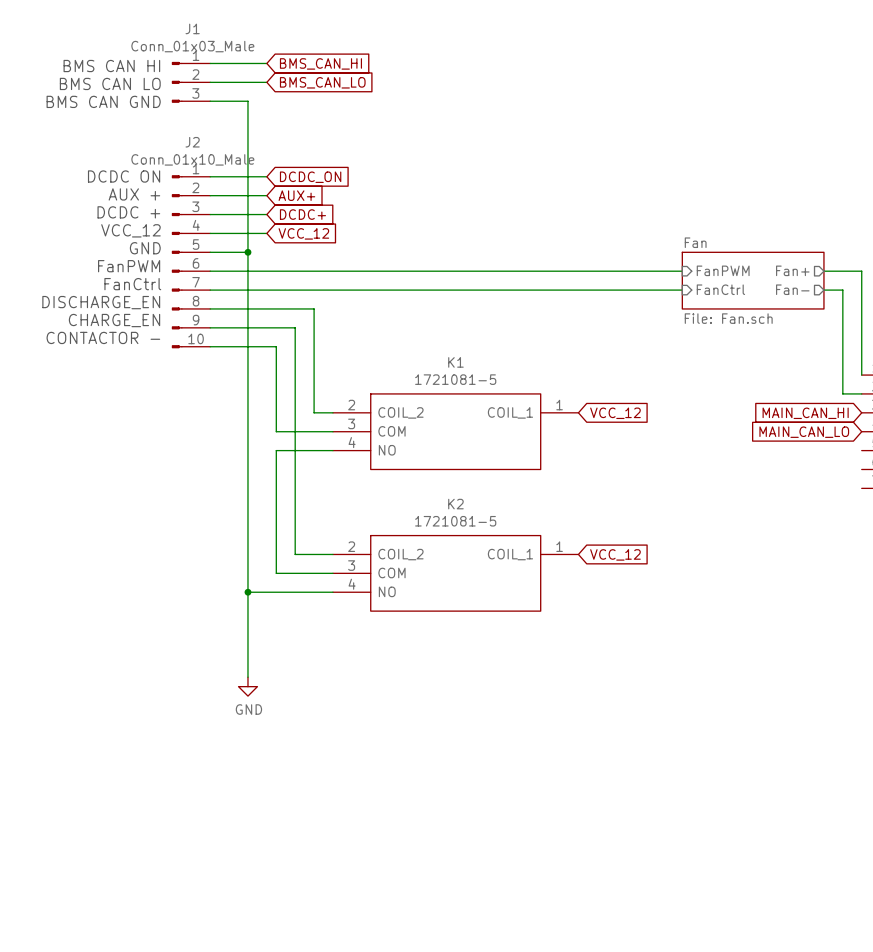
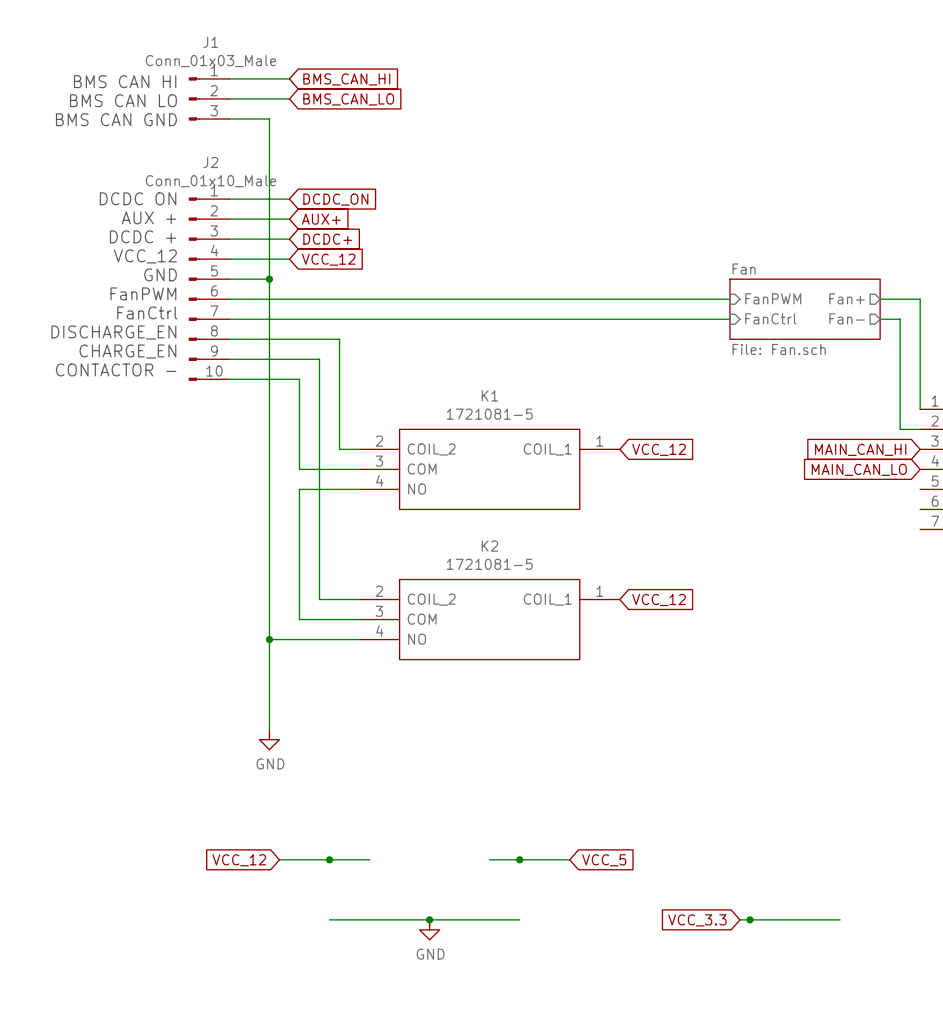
wire: none -> (279, 859) (369, 859)
junction: none -> (329, 859)
wire: none -> (489, 859) (569, 859)
junction: none -> (519, 859)
global label: none -> VCC_12 (239, 860)
global label: none -> VCC_5 (604, 860)
wire: none -> (329, 919) (519, 919)
junction: none -> (429, 919)
wire: none -> (739, 919) (840, 919)
junction: none -> (749, 919)
global label: none -> VCC_3.3 (697, 920)
power symbol: none -> GND (429, 929)

